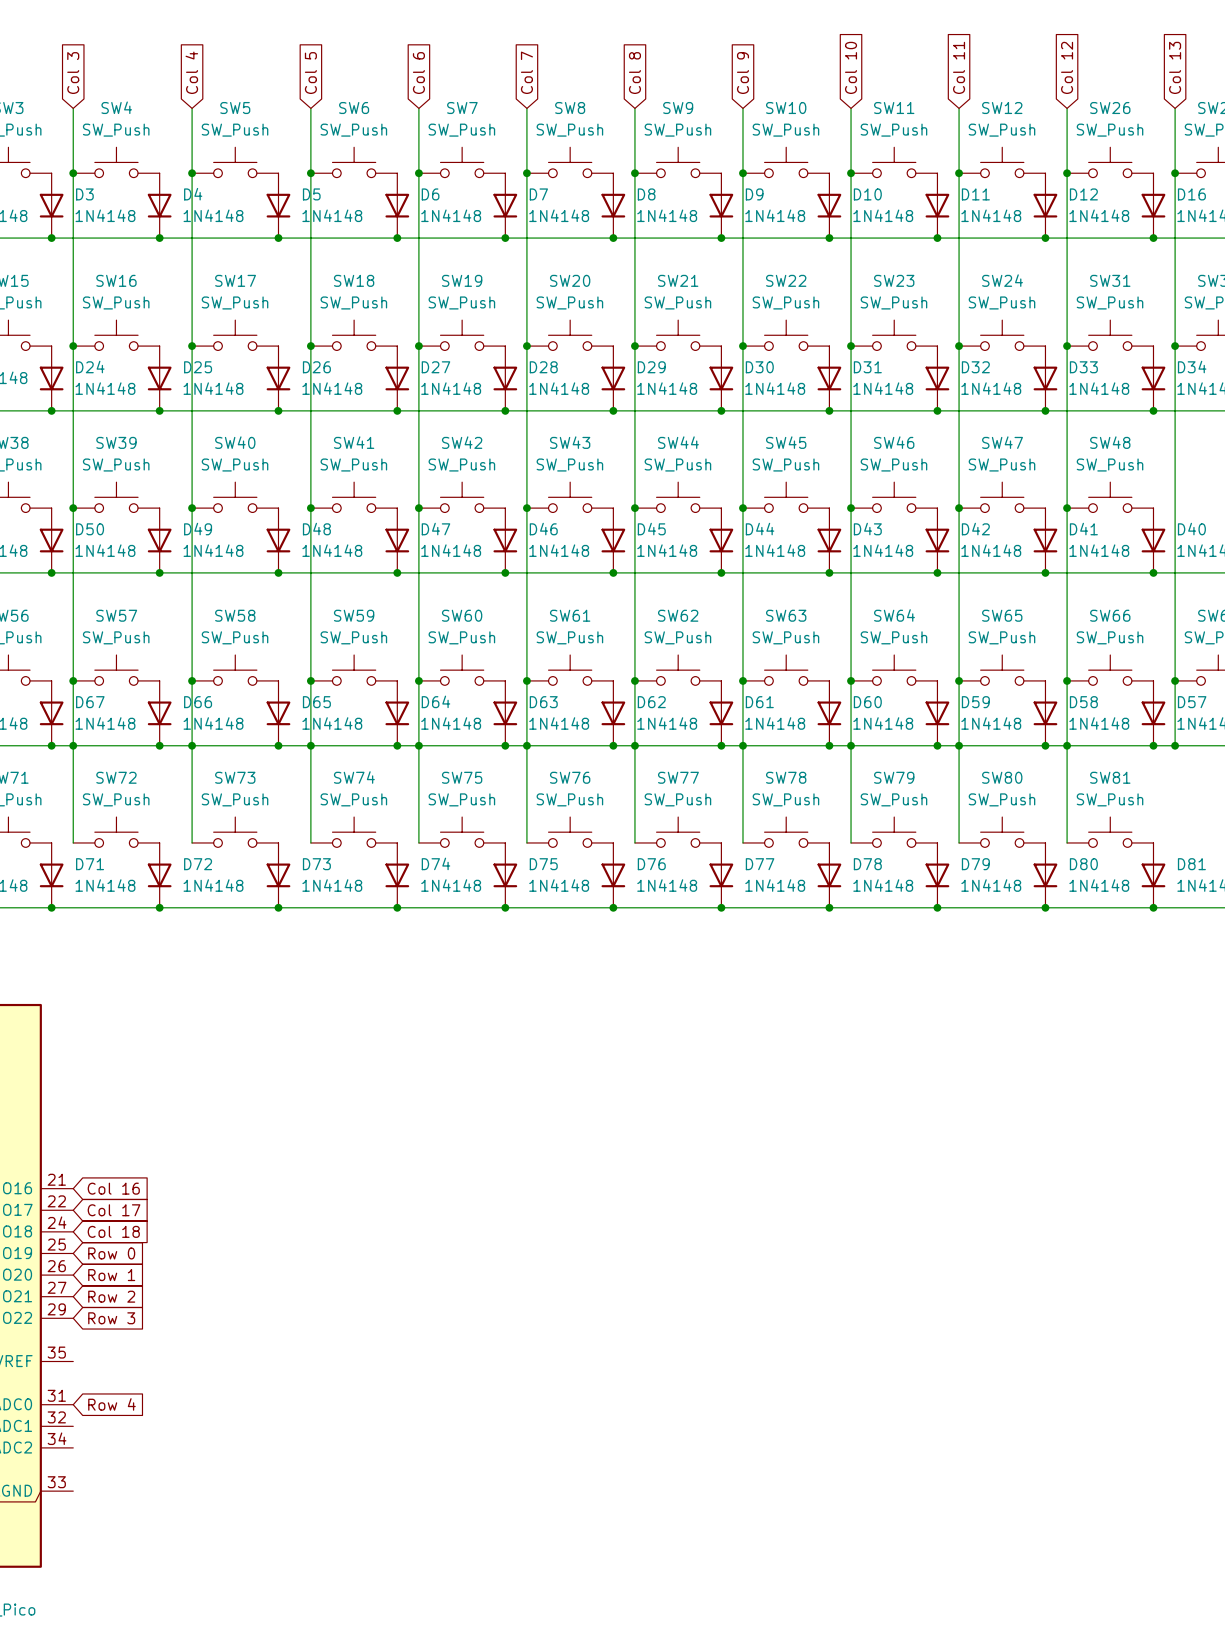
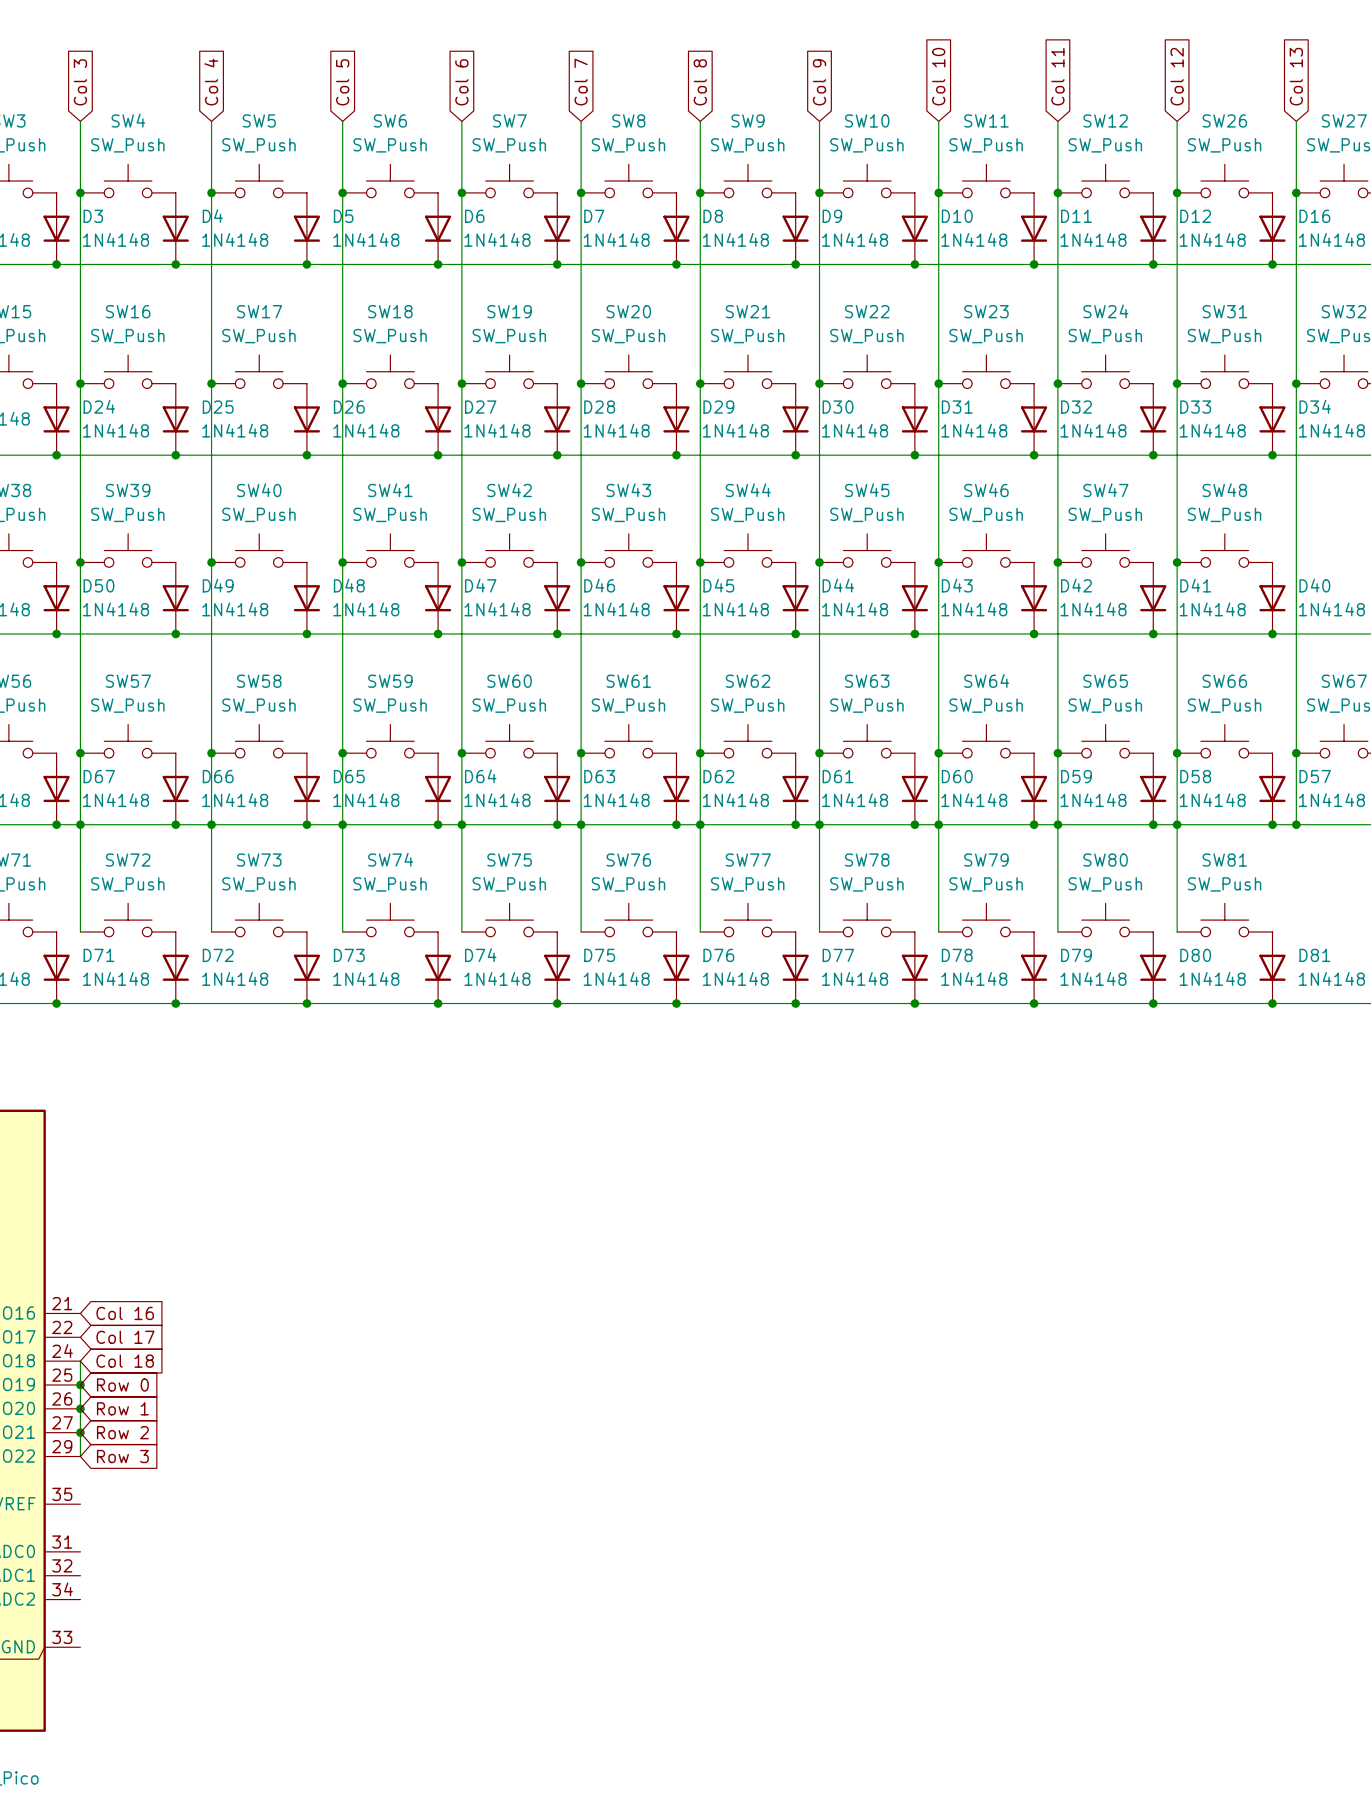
wire: none -> (80, 1361) (80, 1456)
junction: none -> (80, 1384)
junction: none -> (80, 1408)
junction: none -> (80, 1432)
global label: Row 4 (111, 1404) -> none

